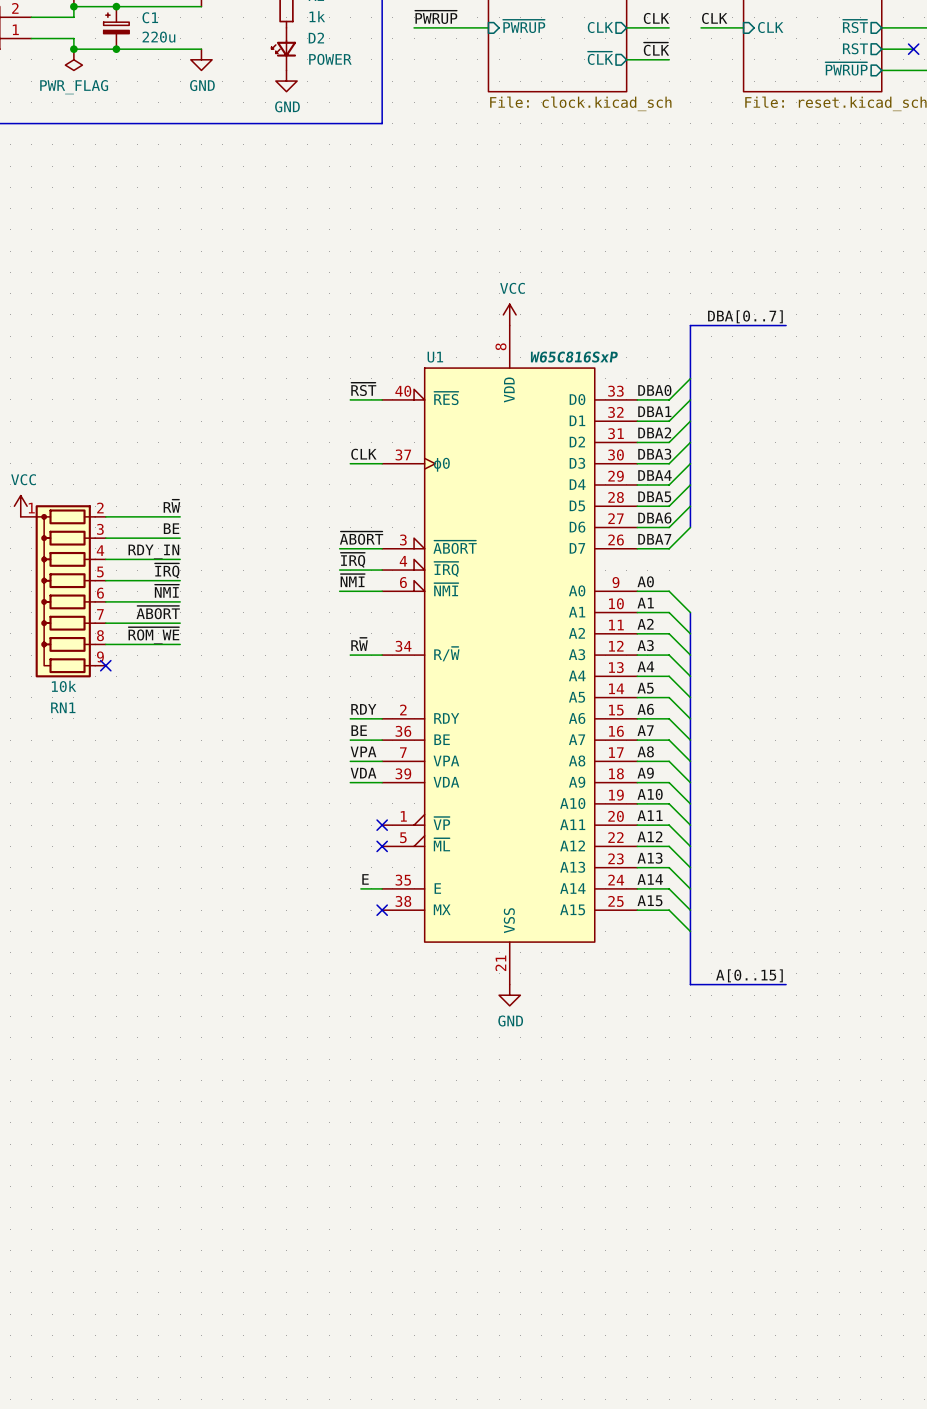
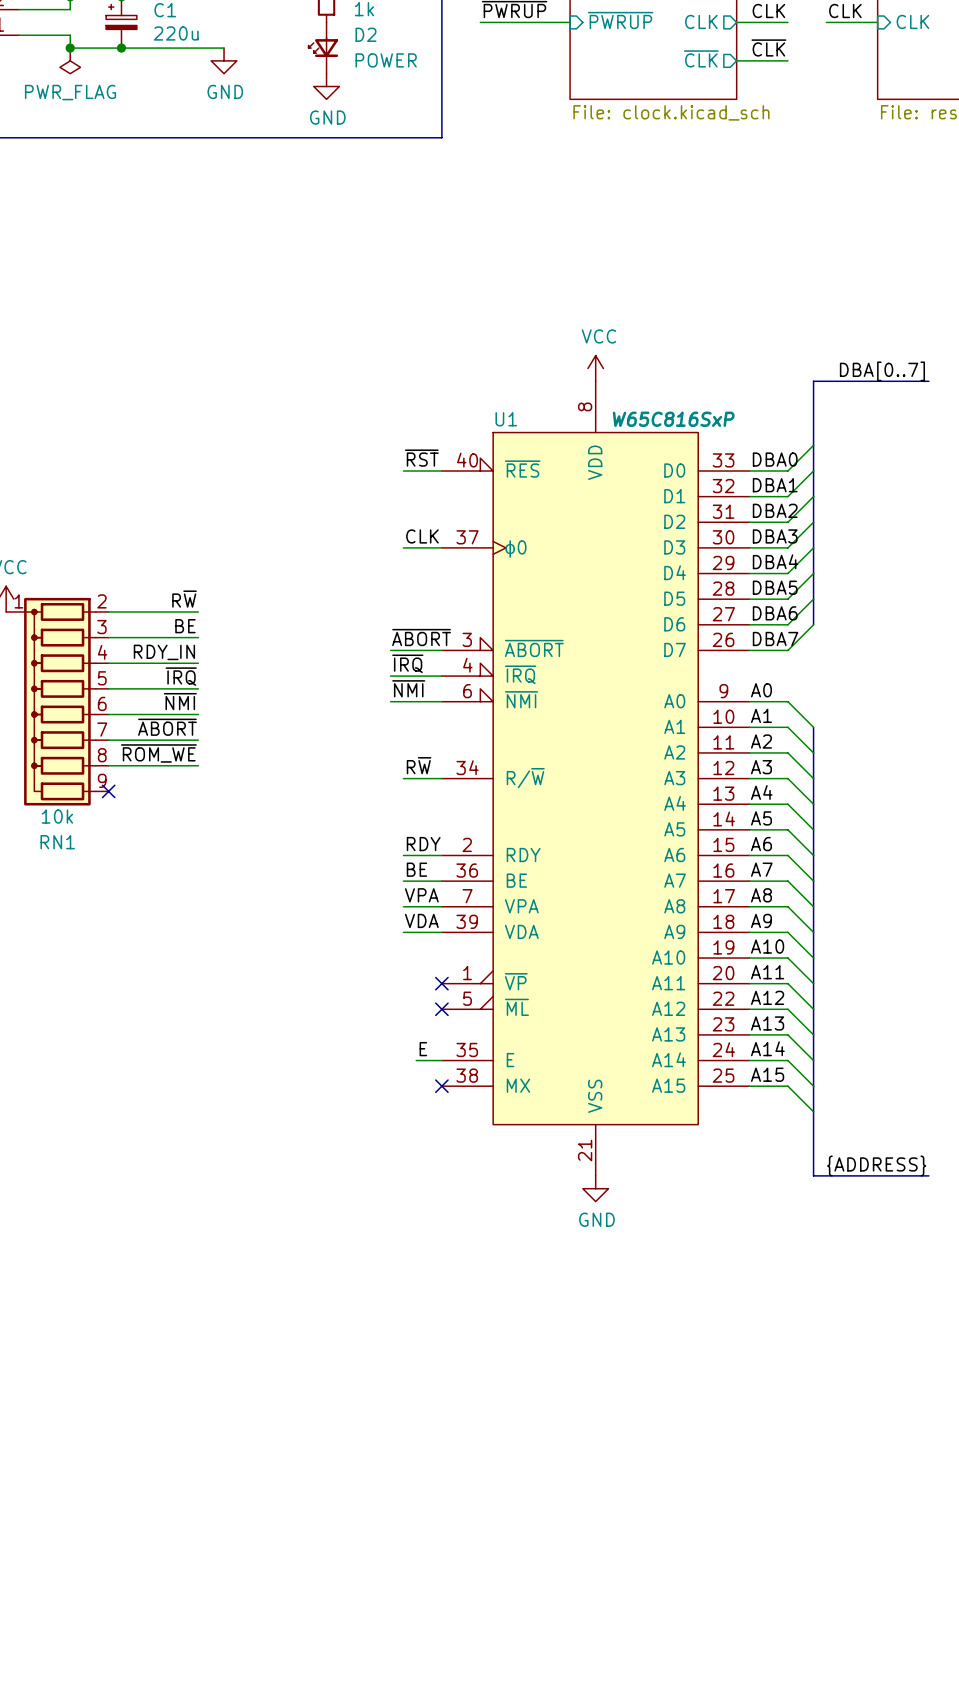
label: A[0..15] (749, 975) -> {ADDRESS} (876, 1165)

